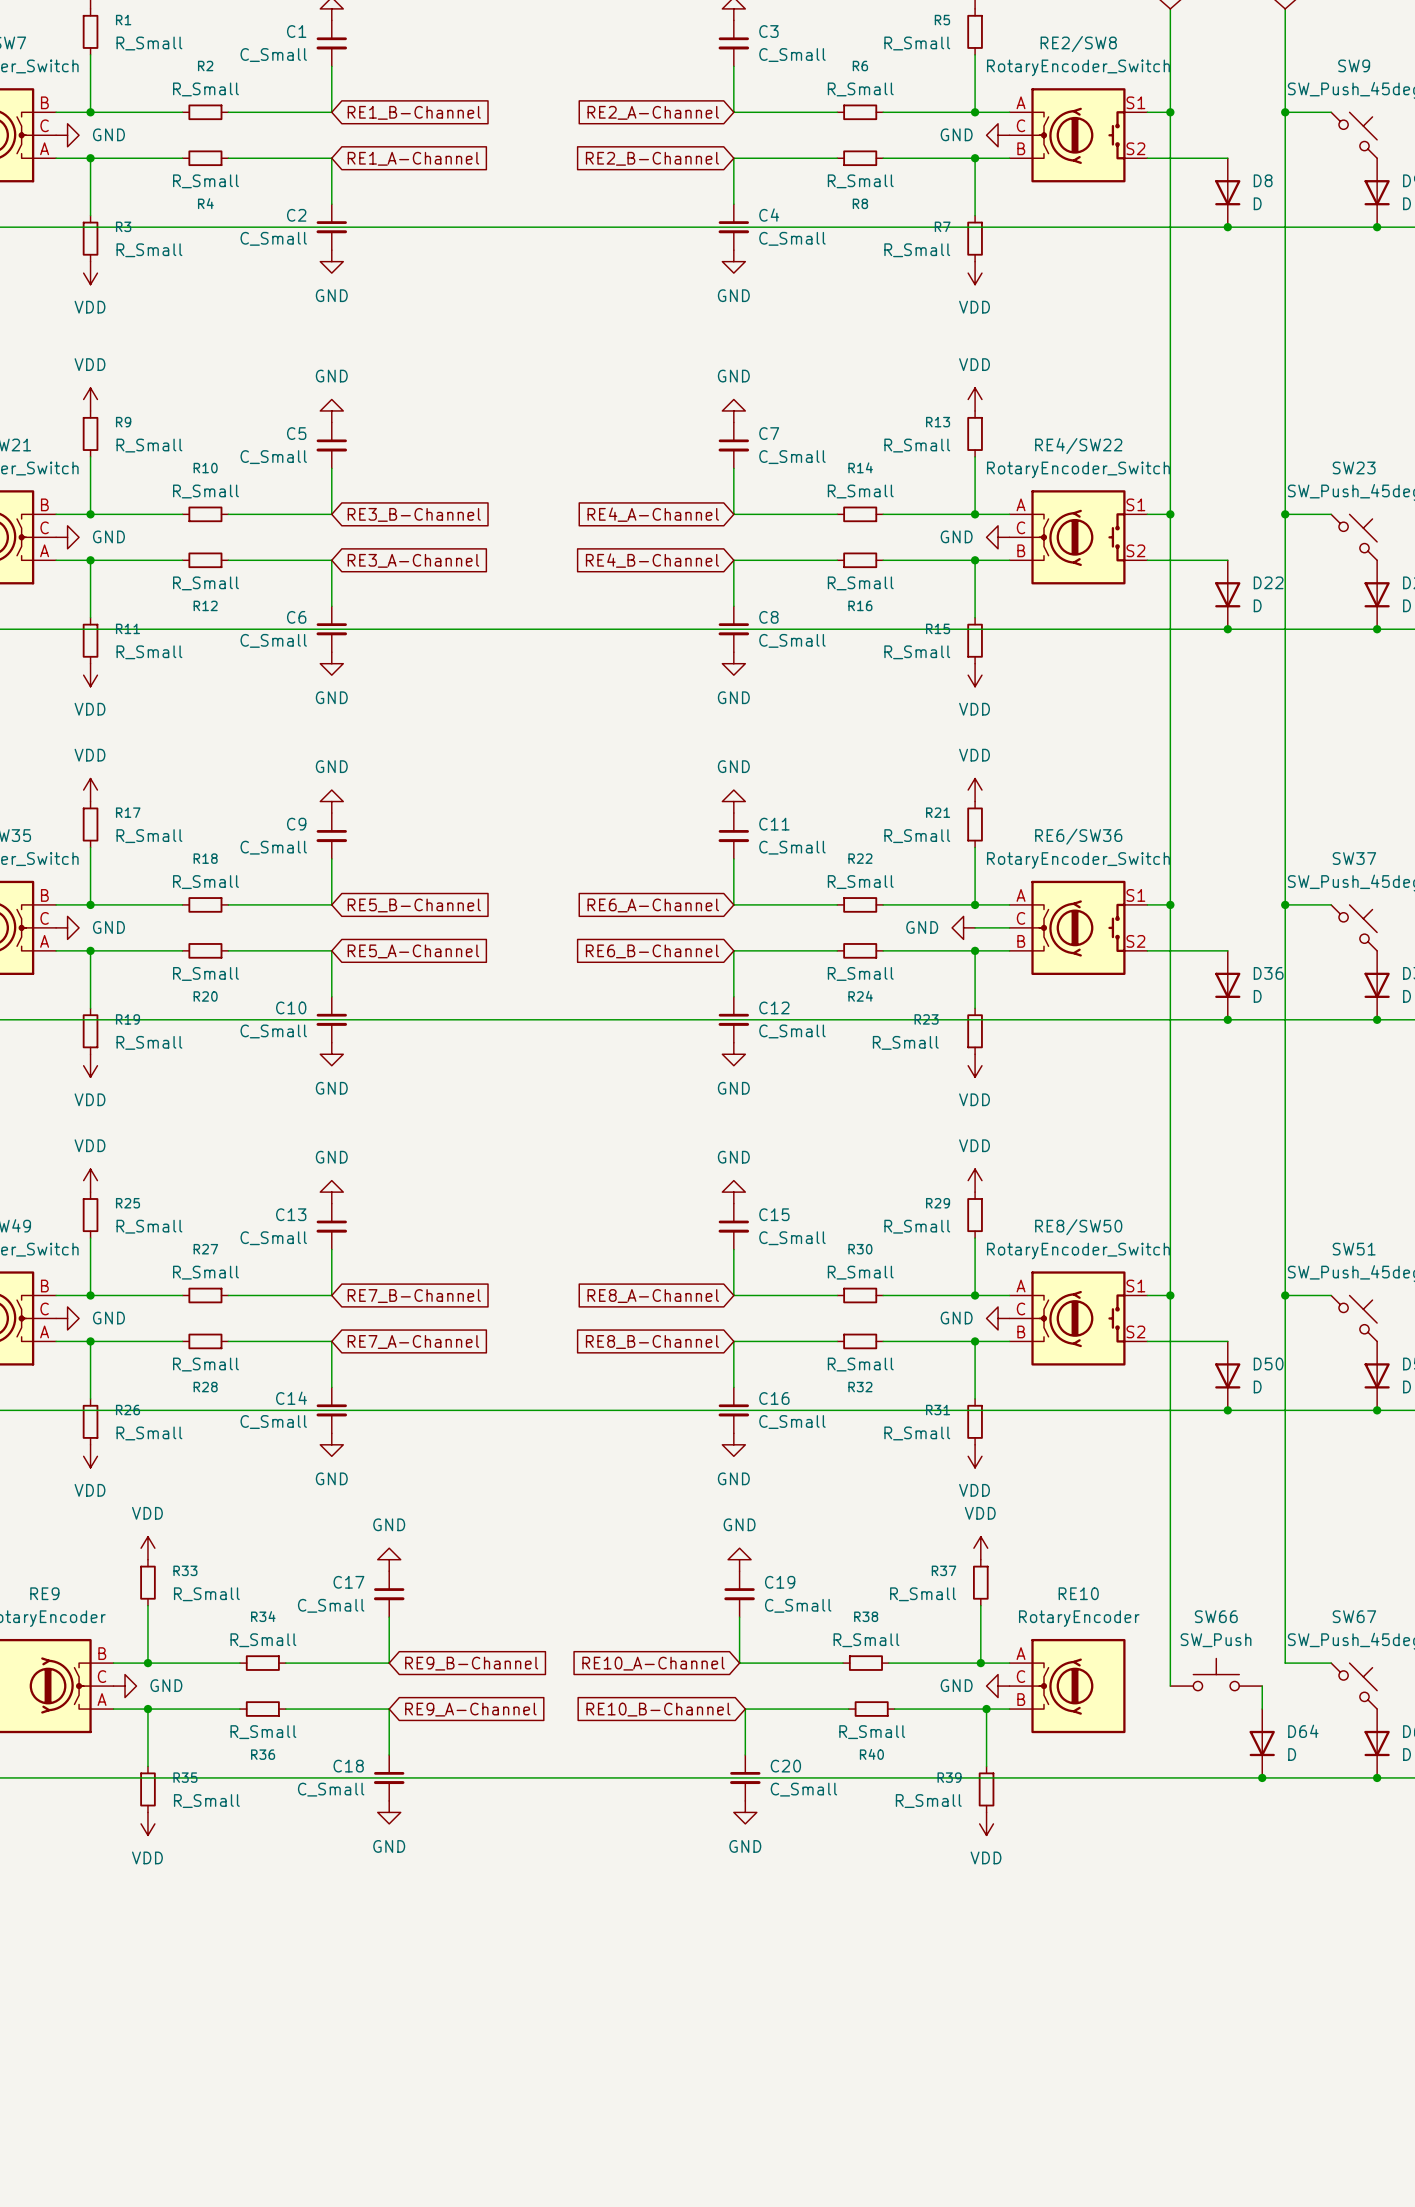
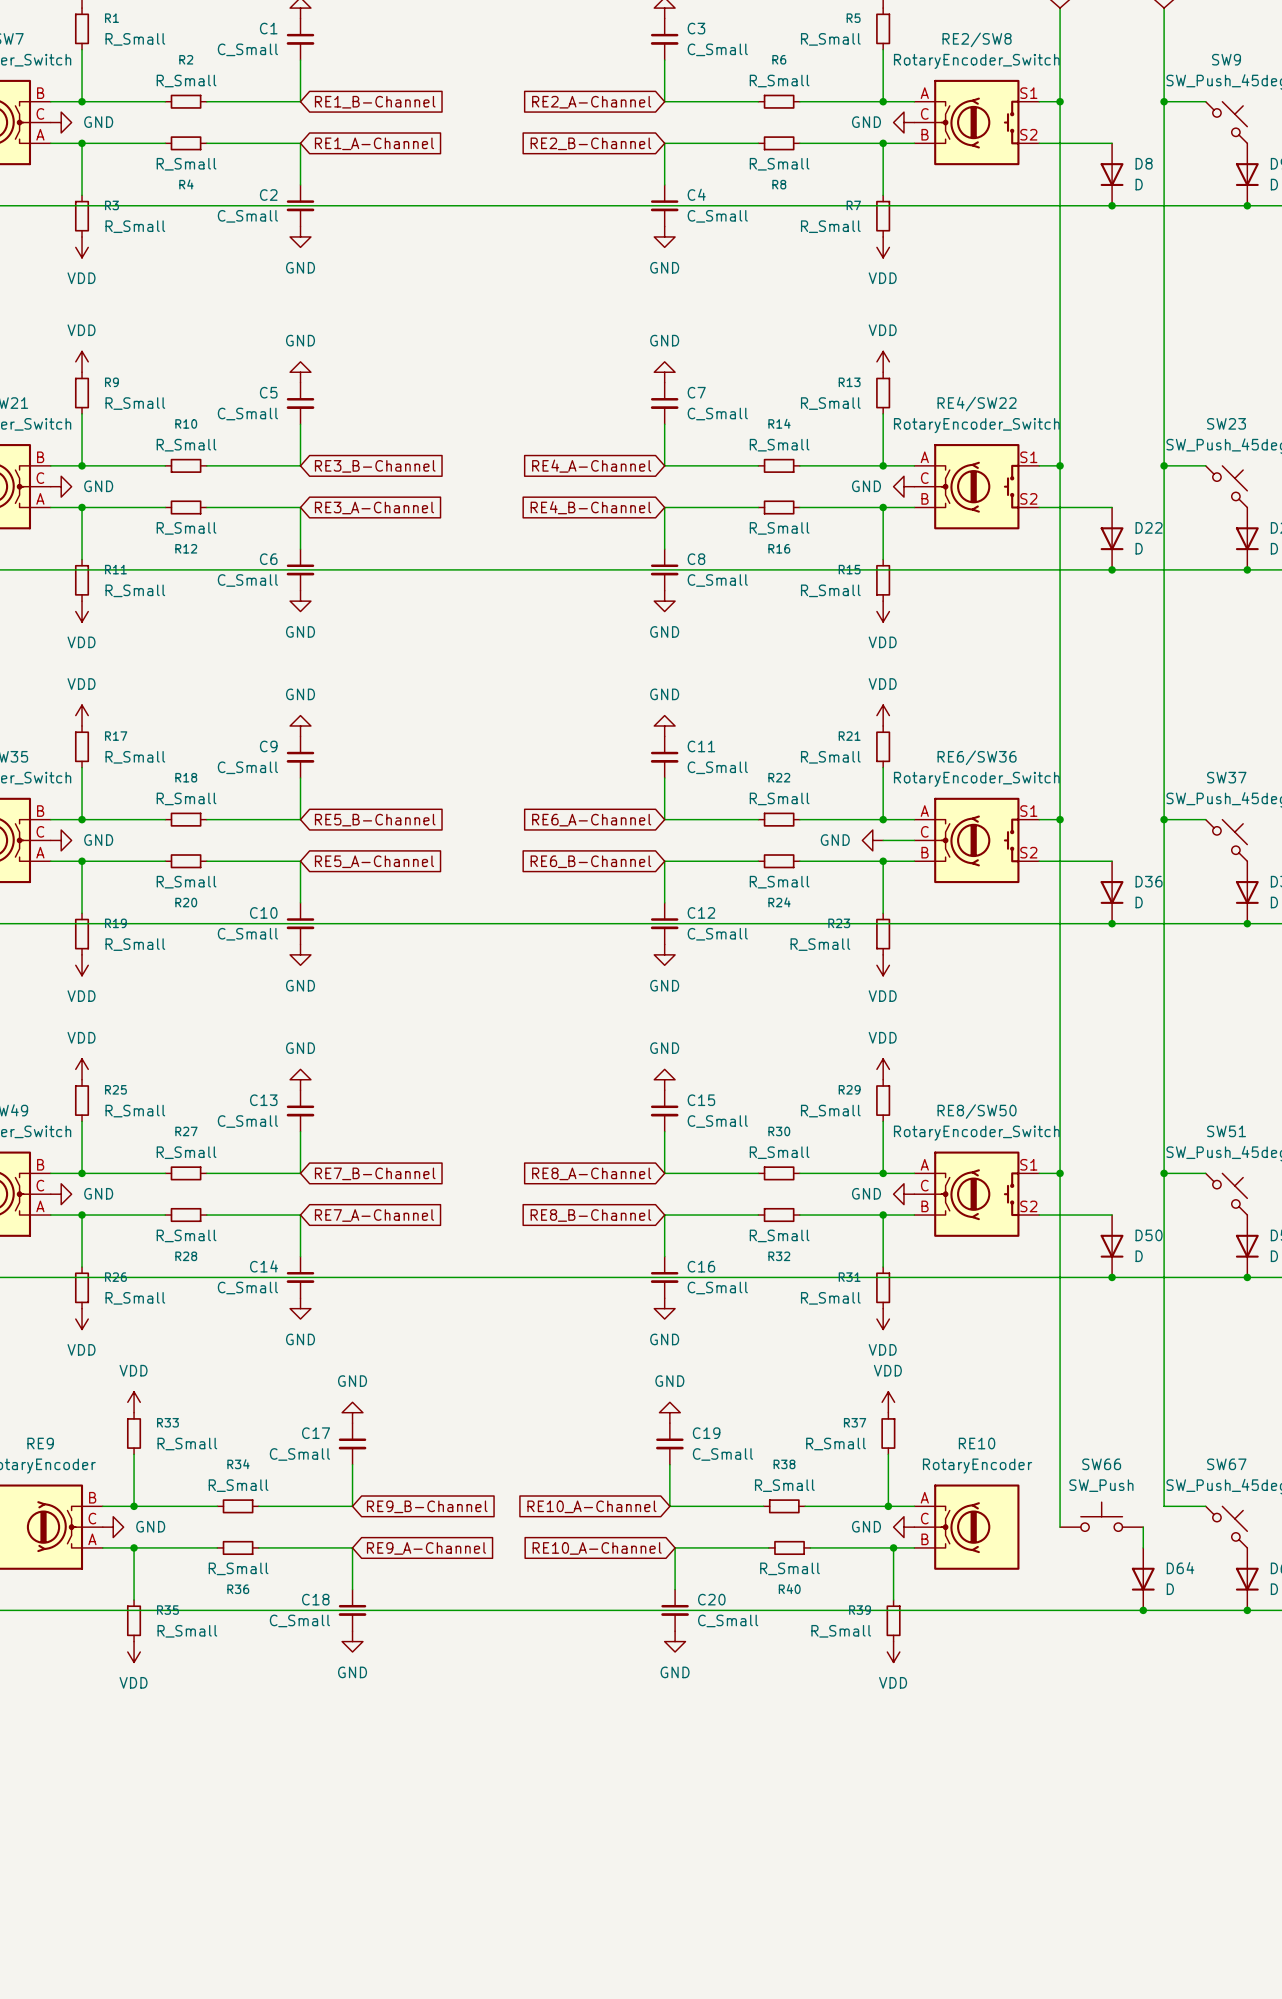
global label: RE10_B-Channel (658, 1709) -> RE10_A-Channel (597, 1548)

